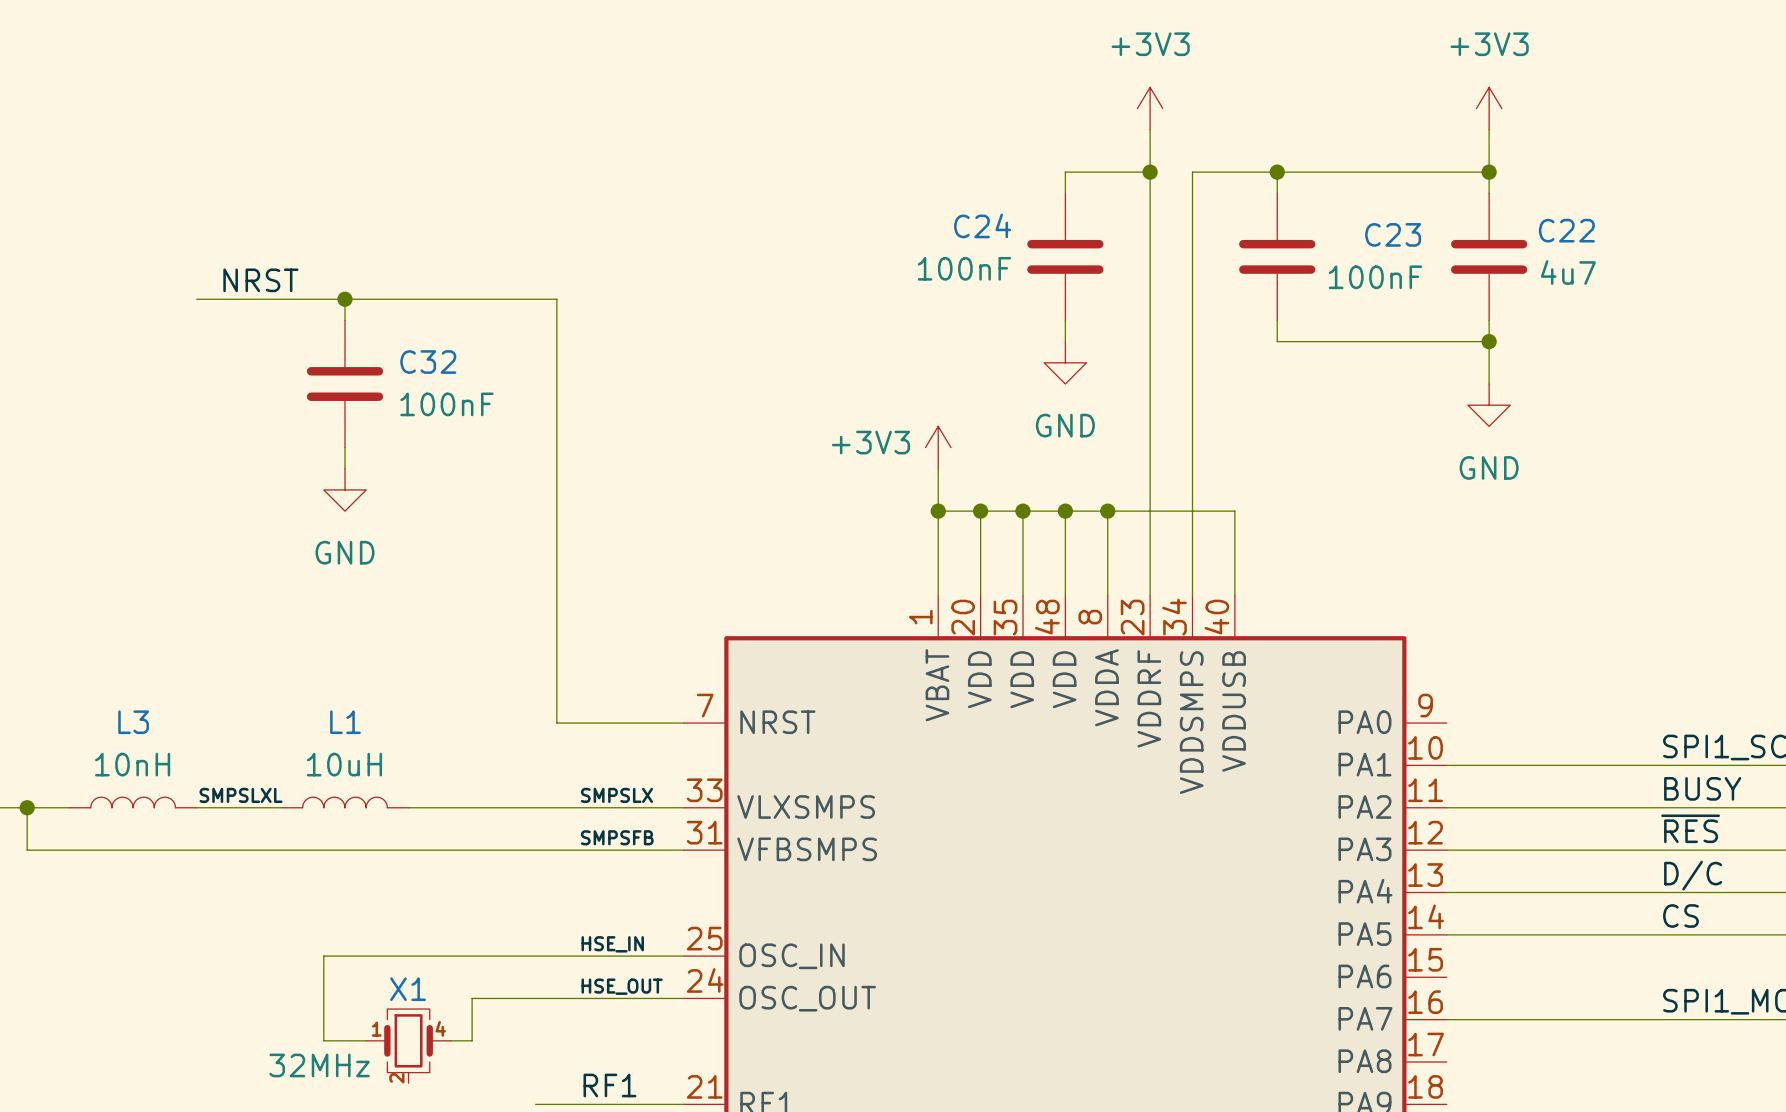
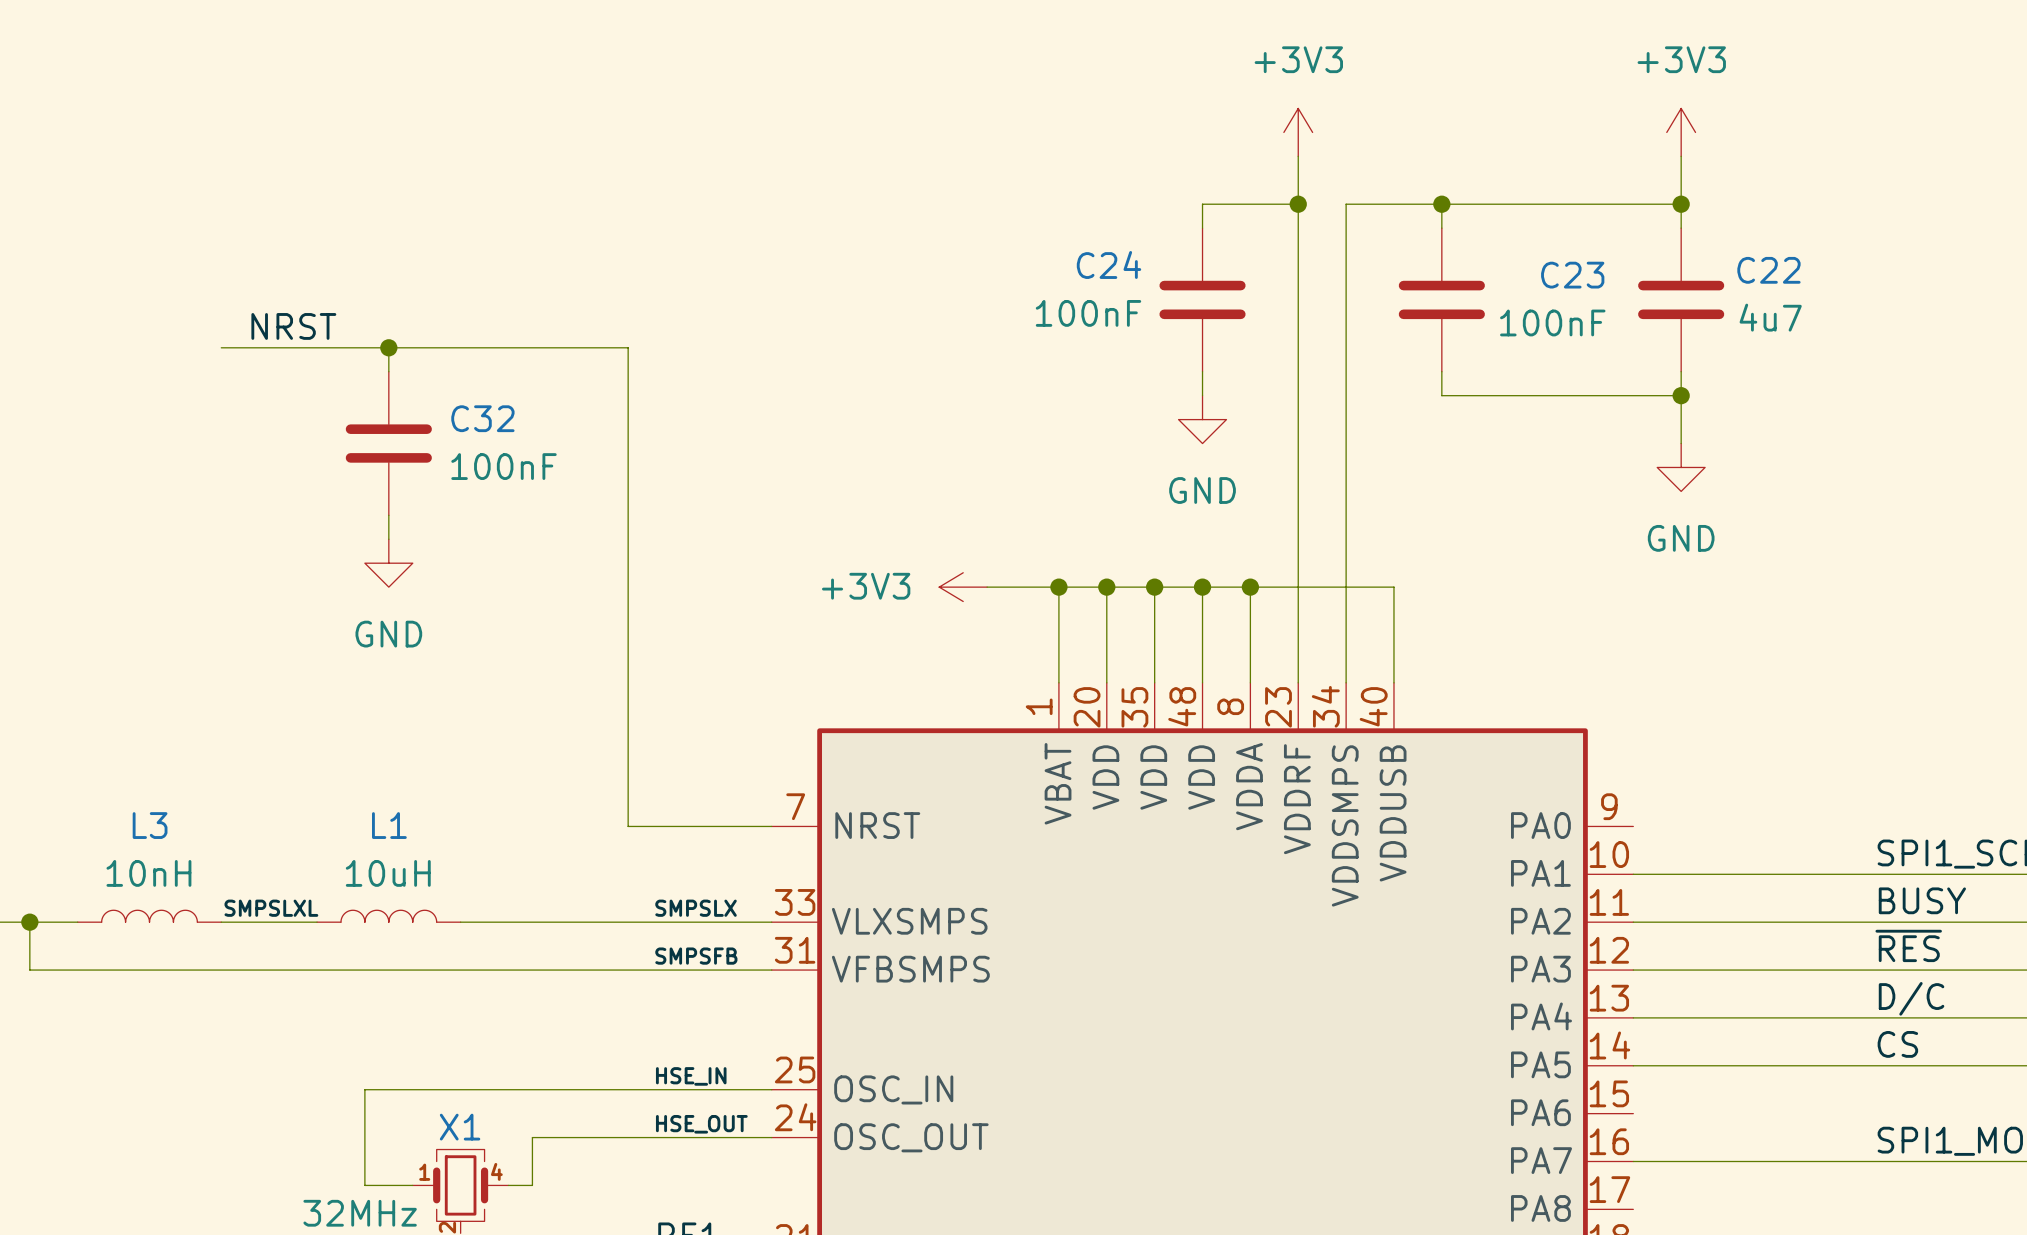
power symbol rotation: 0° (938, 447) -> 90° counterclockwise (963, 587)
power symbol position: +3V3 (938, 447) -> +3V3 (963, 587)
wire: (938, 468) (938, 511) -> (987, 587) (1058, 587)

